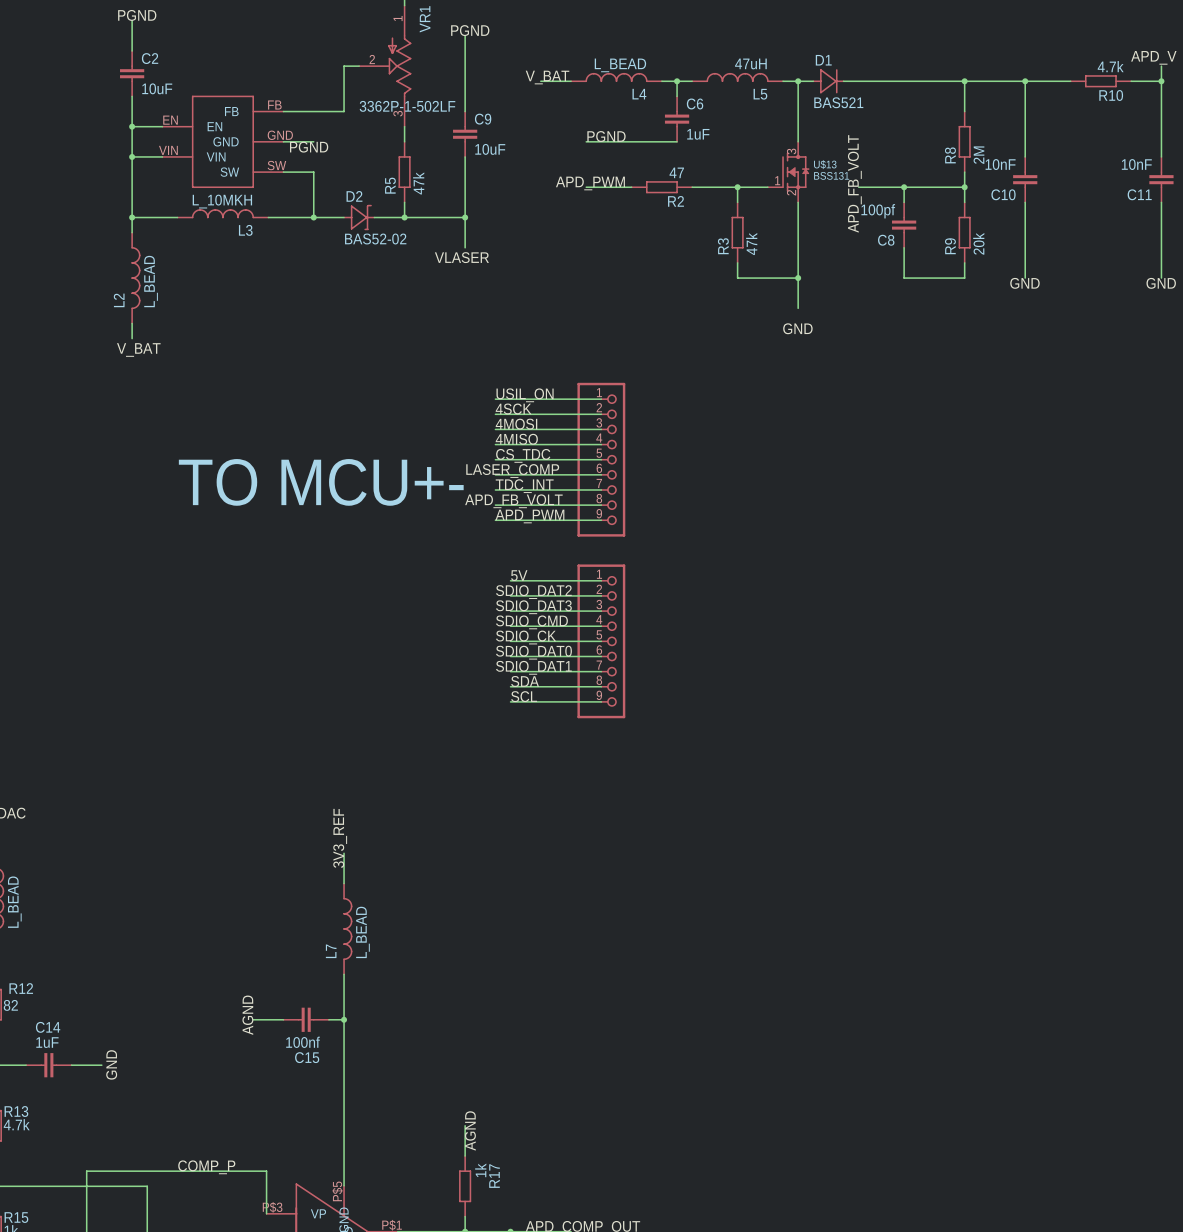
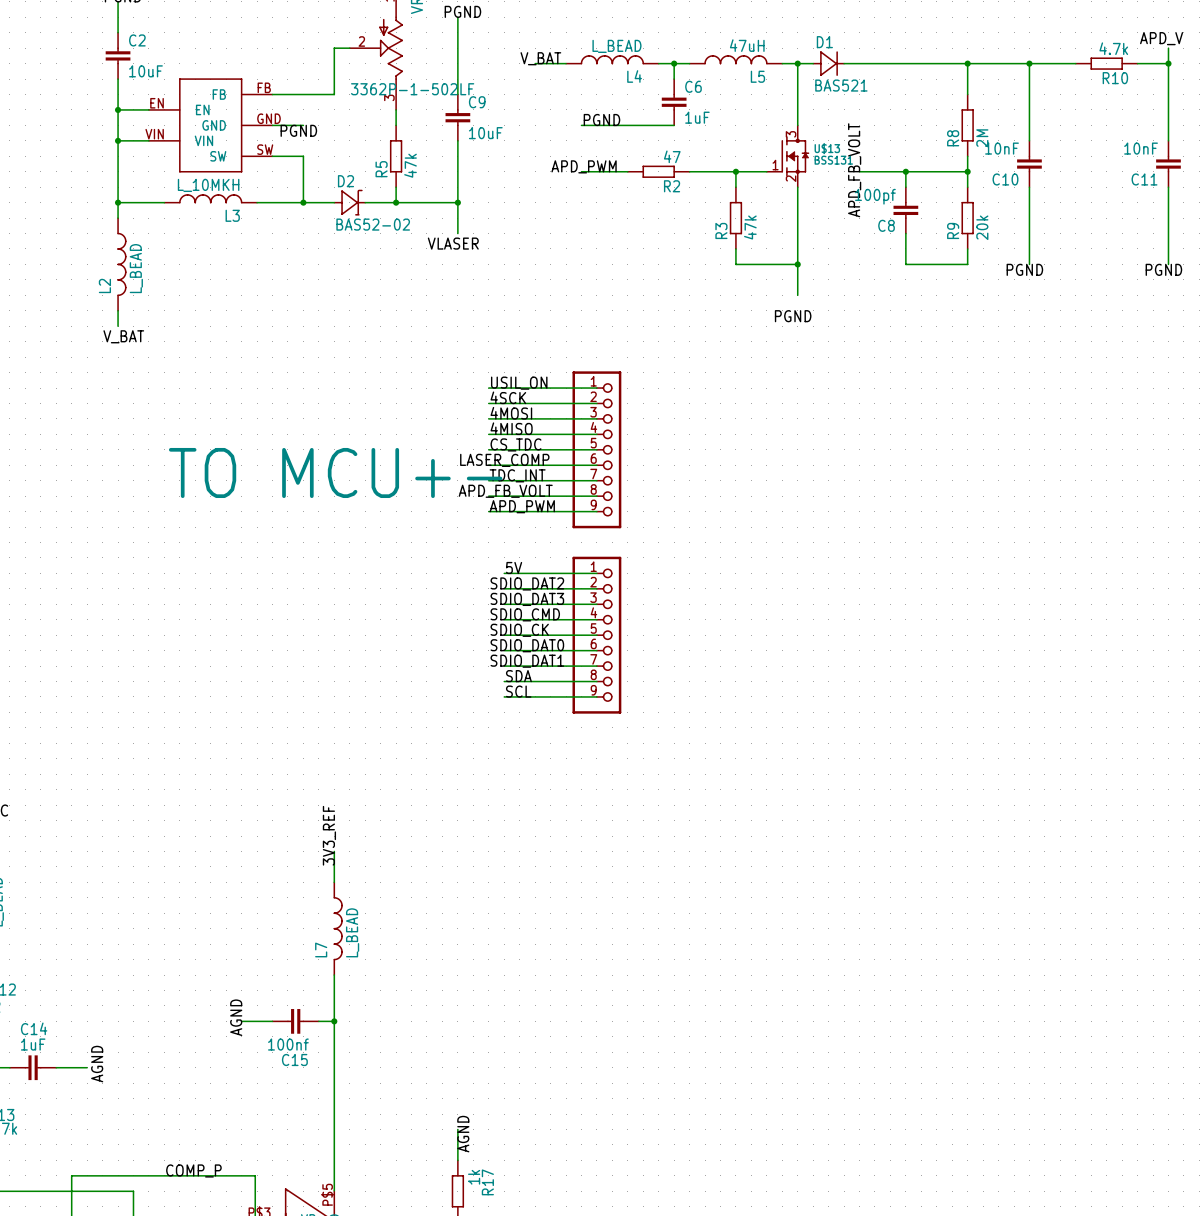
label: GND (1024, 283) -> PGND (1024, 269)
label: GND (1161, 283) -> PGND (1163, 269)
label: GND (797, 328) -> PGND (793, 316)
label: GND (111, 1064) -> AGND (97, 1064)

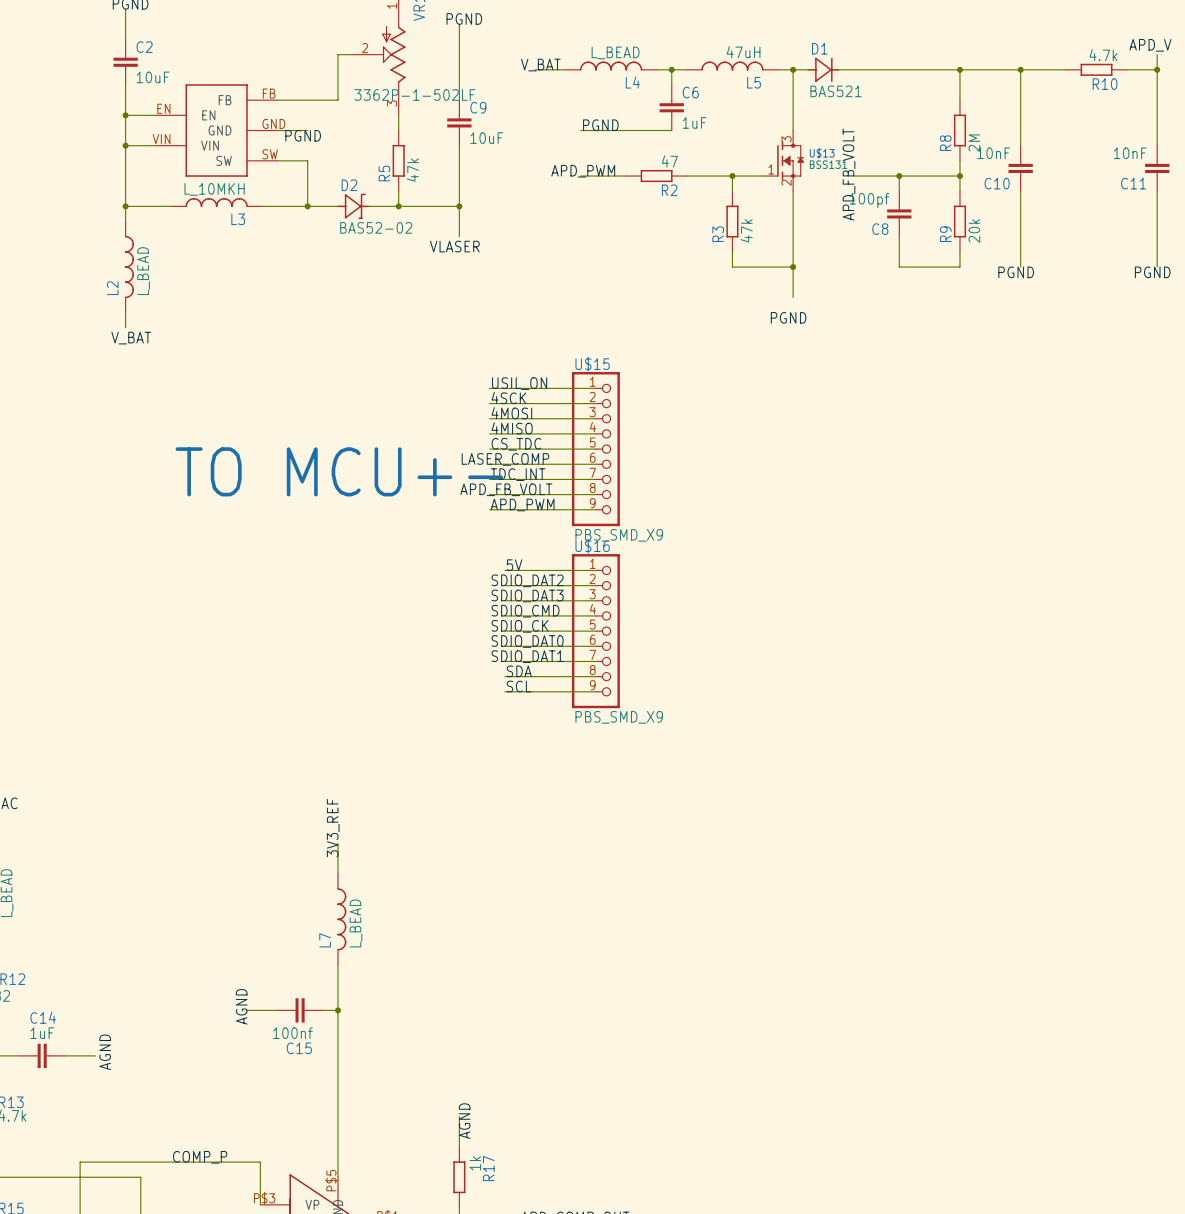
U$15 name: none -> U$15 (592, 364)
U$15 value: none -> PBS_SMD_X9 (619, 535)
U$16 name: none -> U$16 (592, 546)
U$16 value: none -> PBS_SMD_X9 (619, 717)

